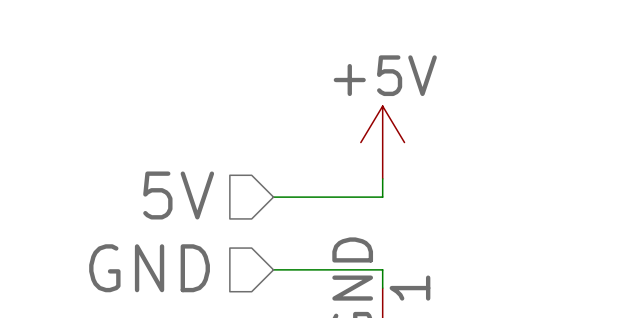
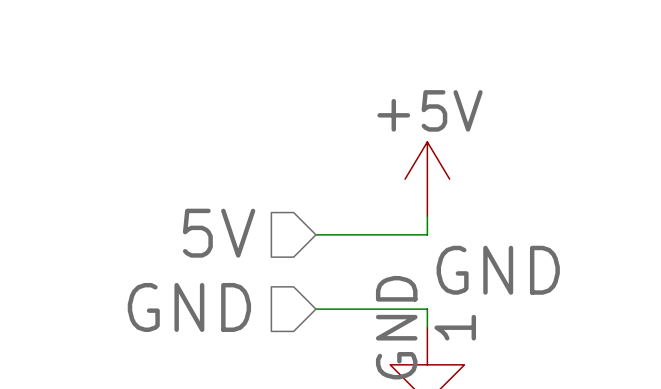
label: none -> GND (498, 270)

